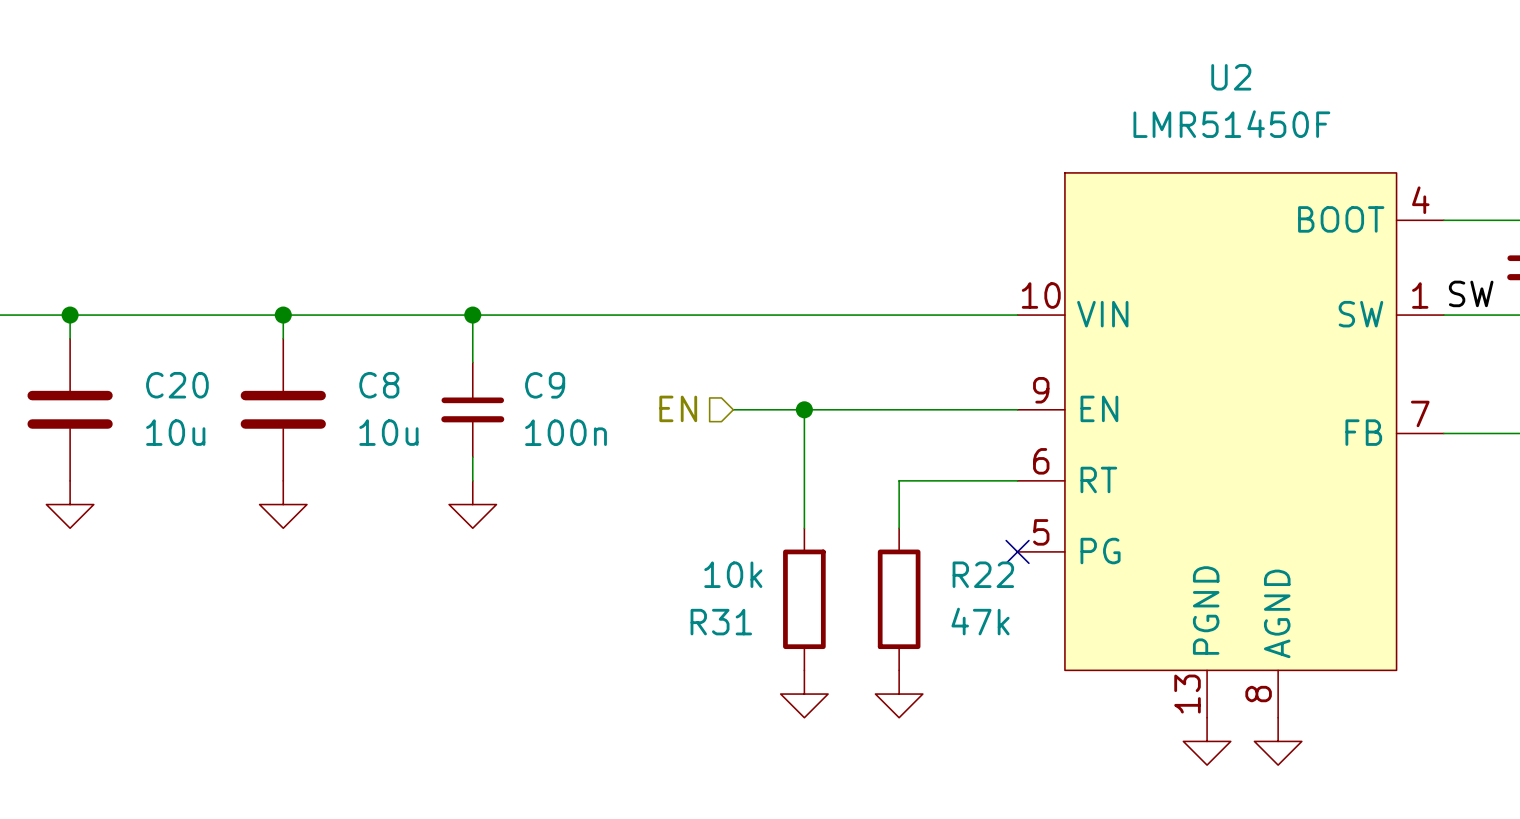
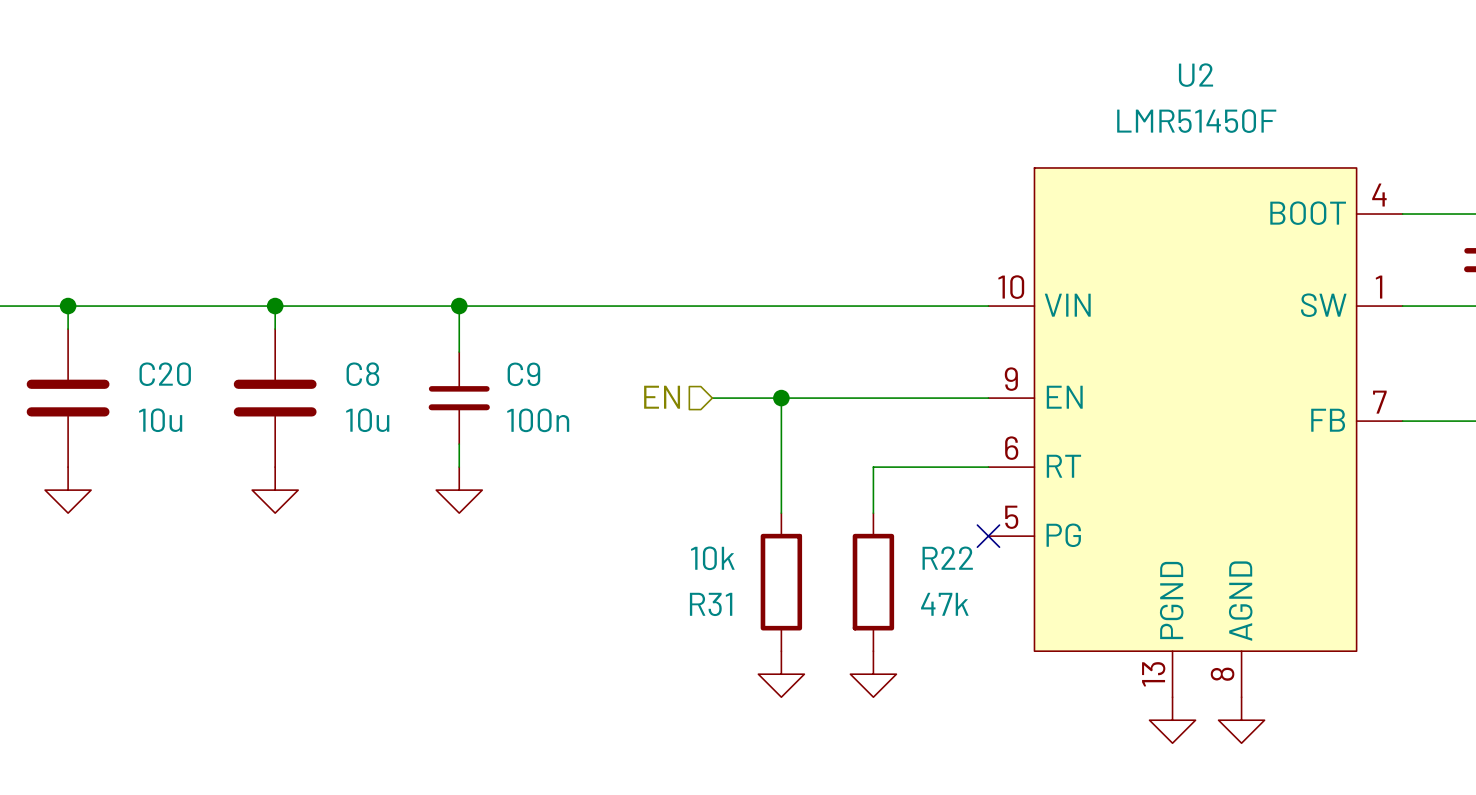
label: SW (1471, 293) -> none

